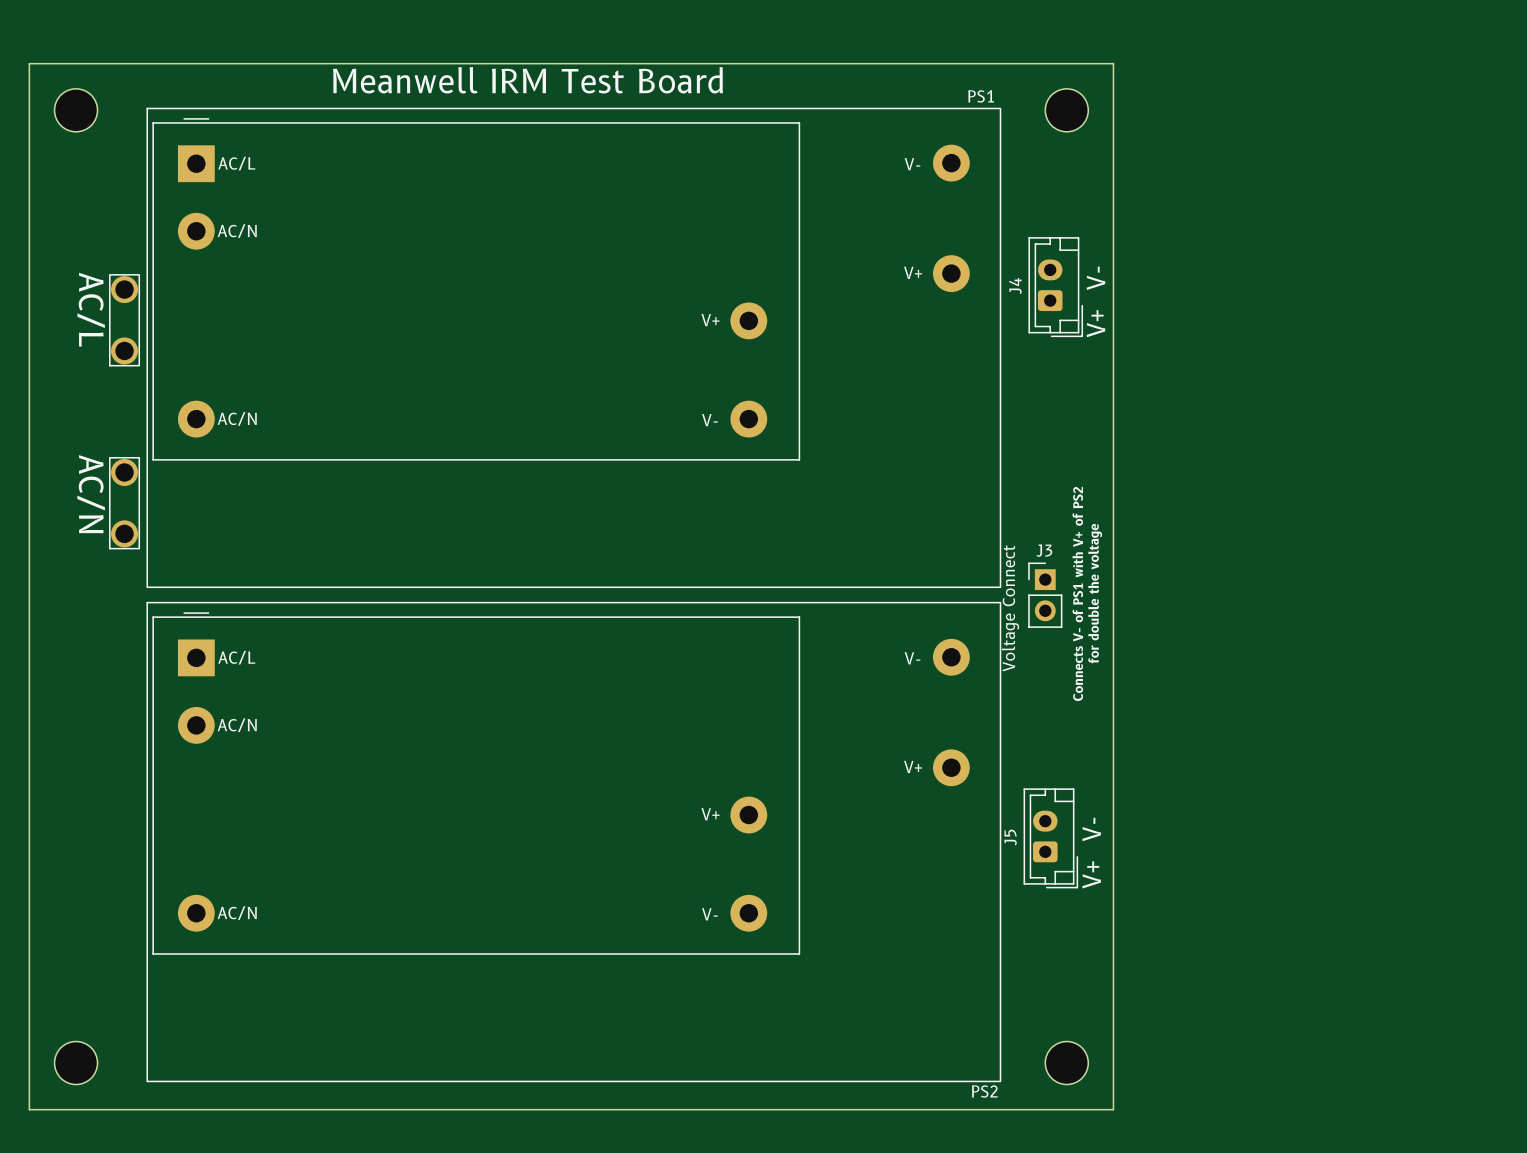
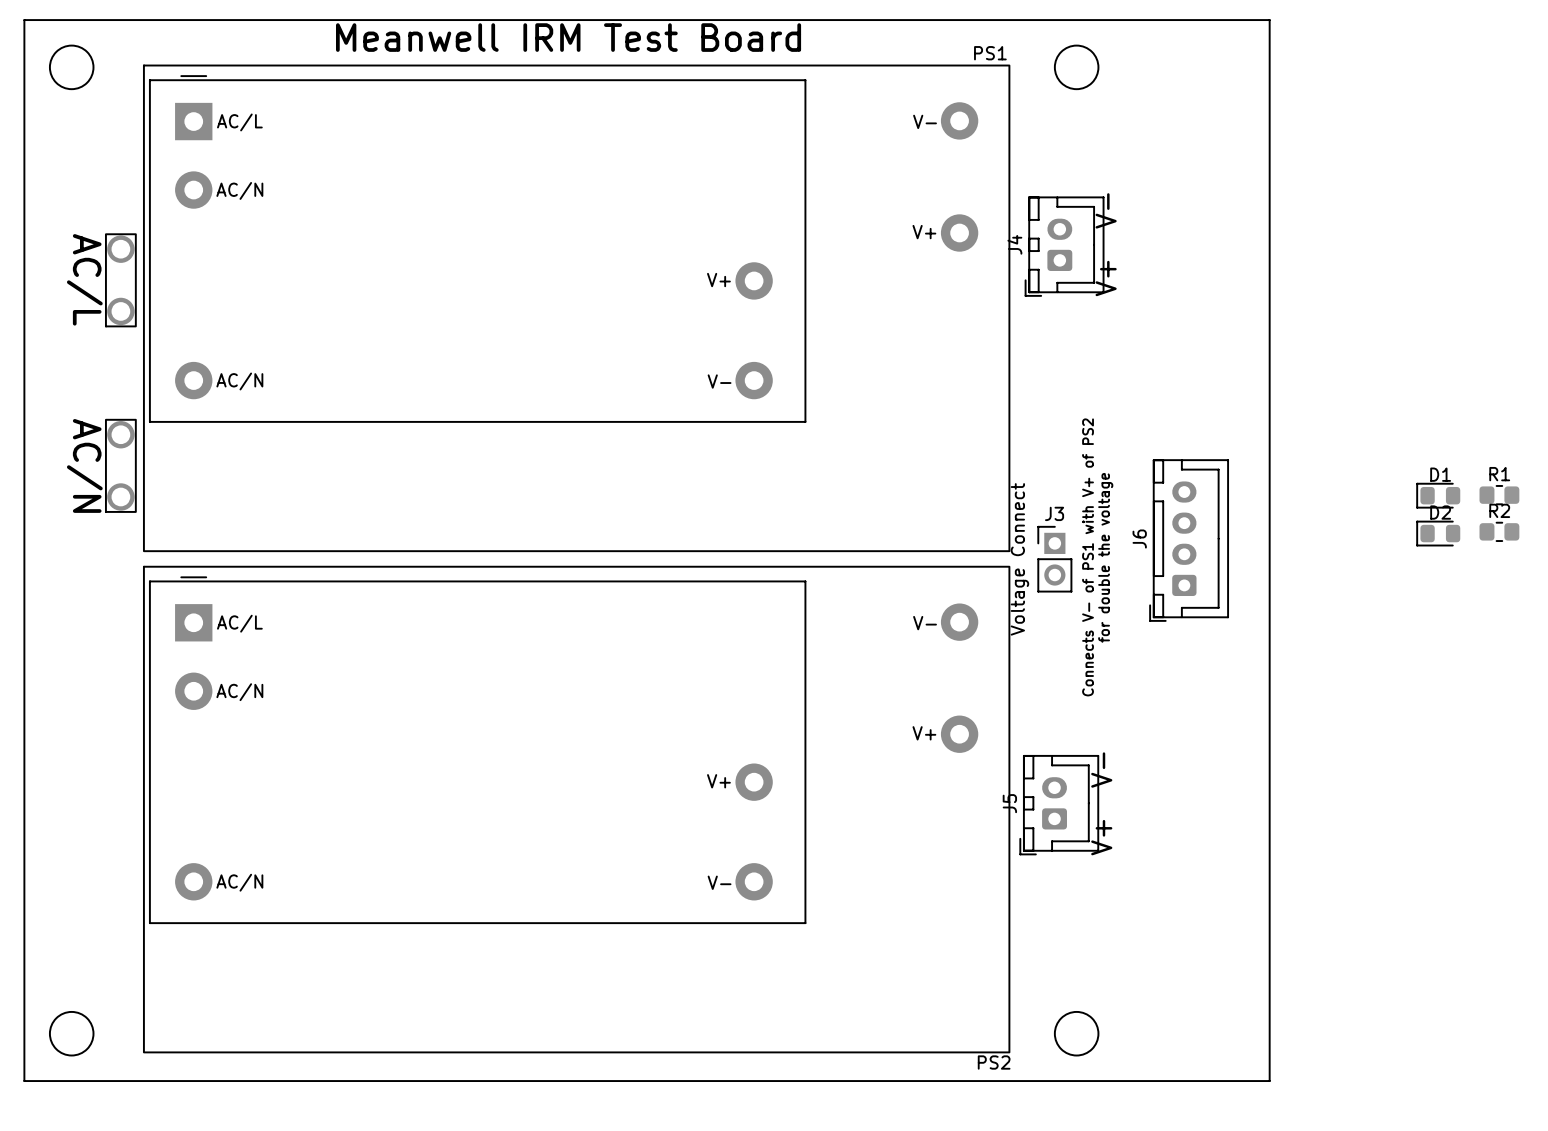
board edge: (1113, 63) (1113, 1109) -> (1123, 20) (1269, 20) (1269, 1081) (1123, 1081)
J4 footprint: [1028, 237, 1084, 338] -> [1024, 196, 1105, 297]
D1: none -> (1438, 495)
R1: none -> (1499, 495)
R2: none -> (1499, 531)
D2: none -> (1438, 533)
J6: none -> (1189, 540)
J5 footprint: [1023, 788, 1079, 889] -> [1019, 755, 1100, 856]

